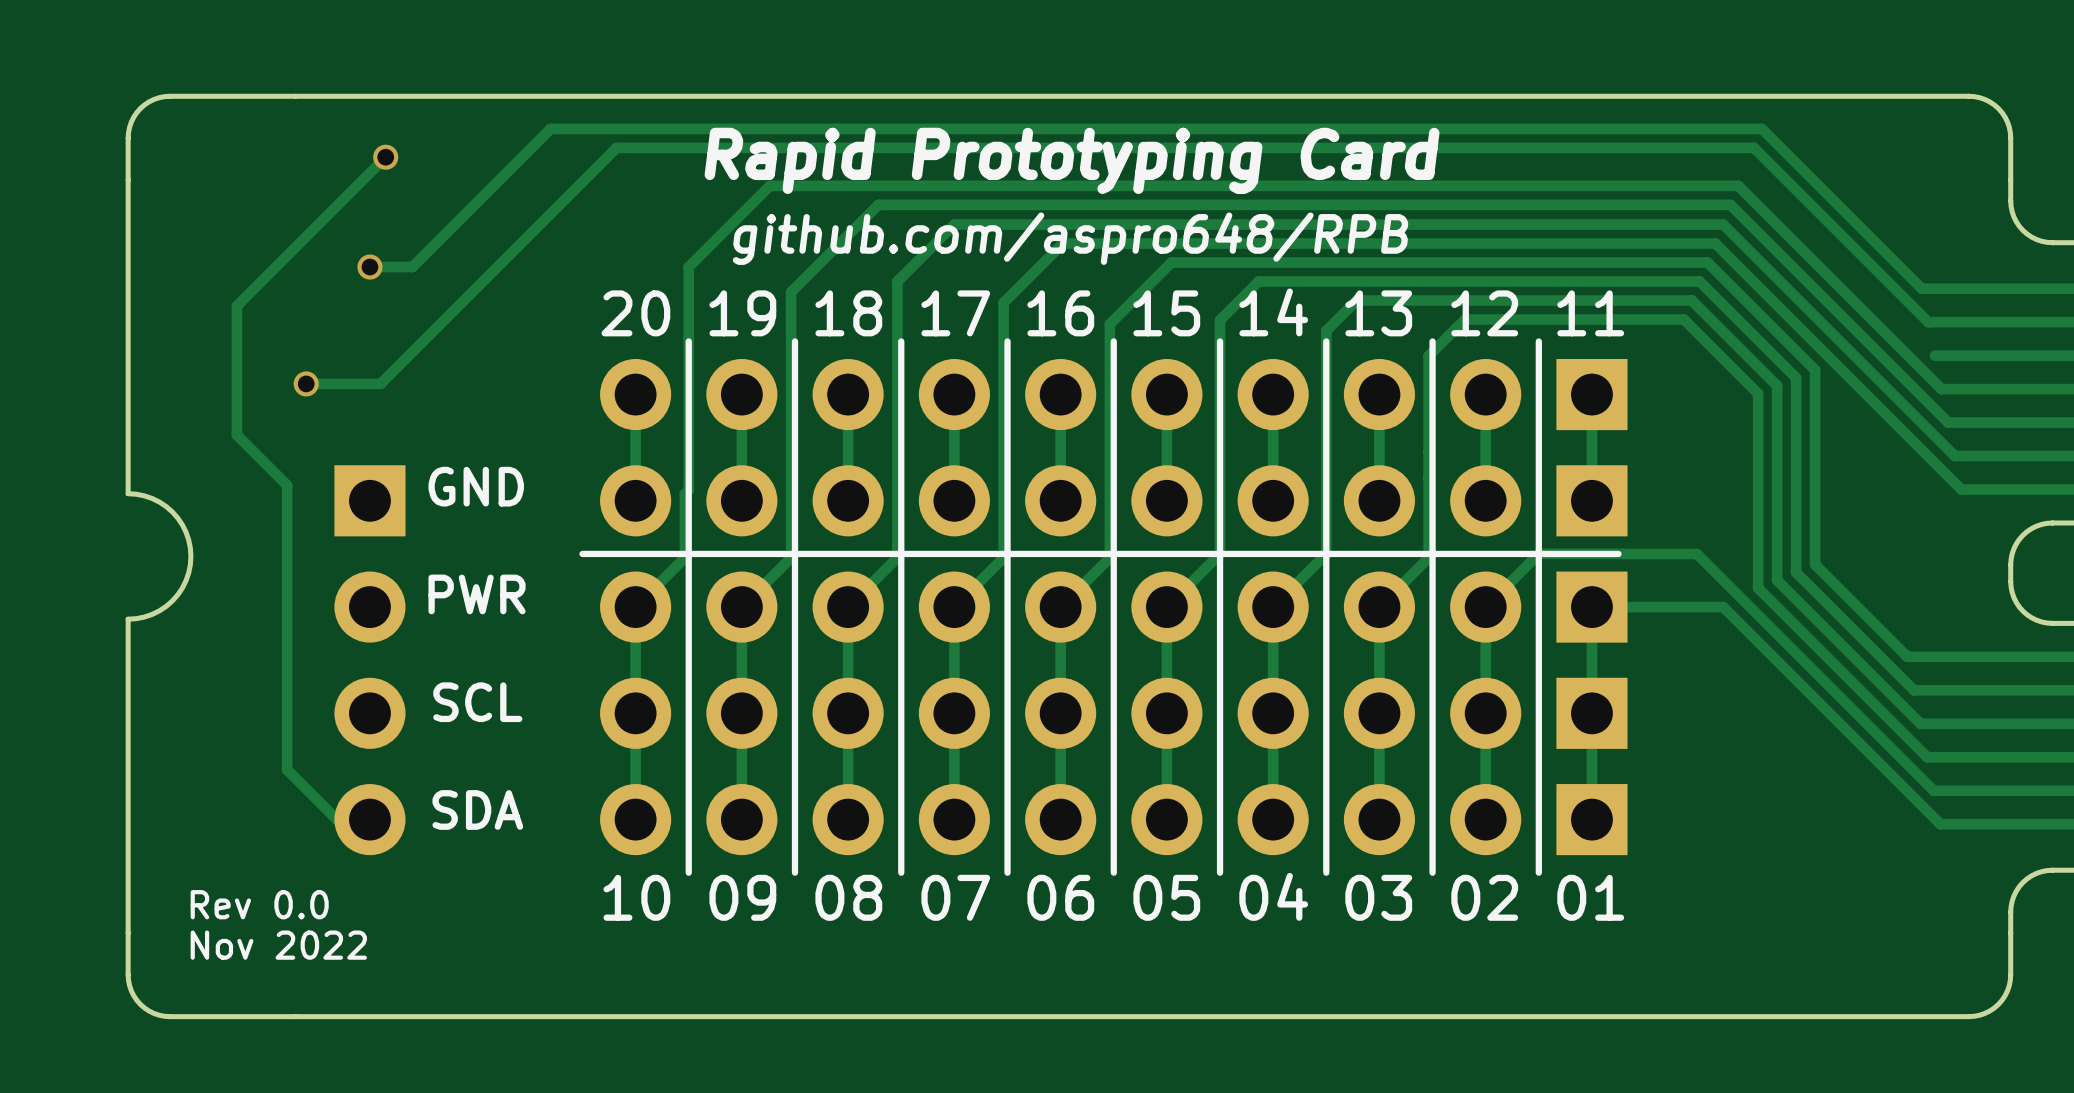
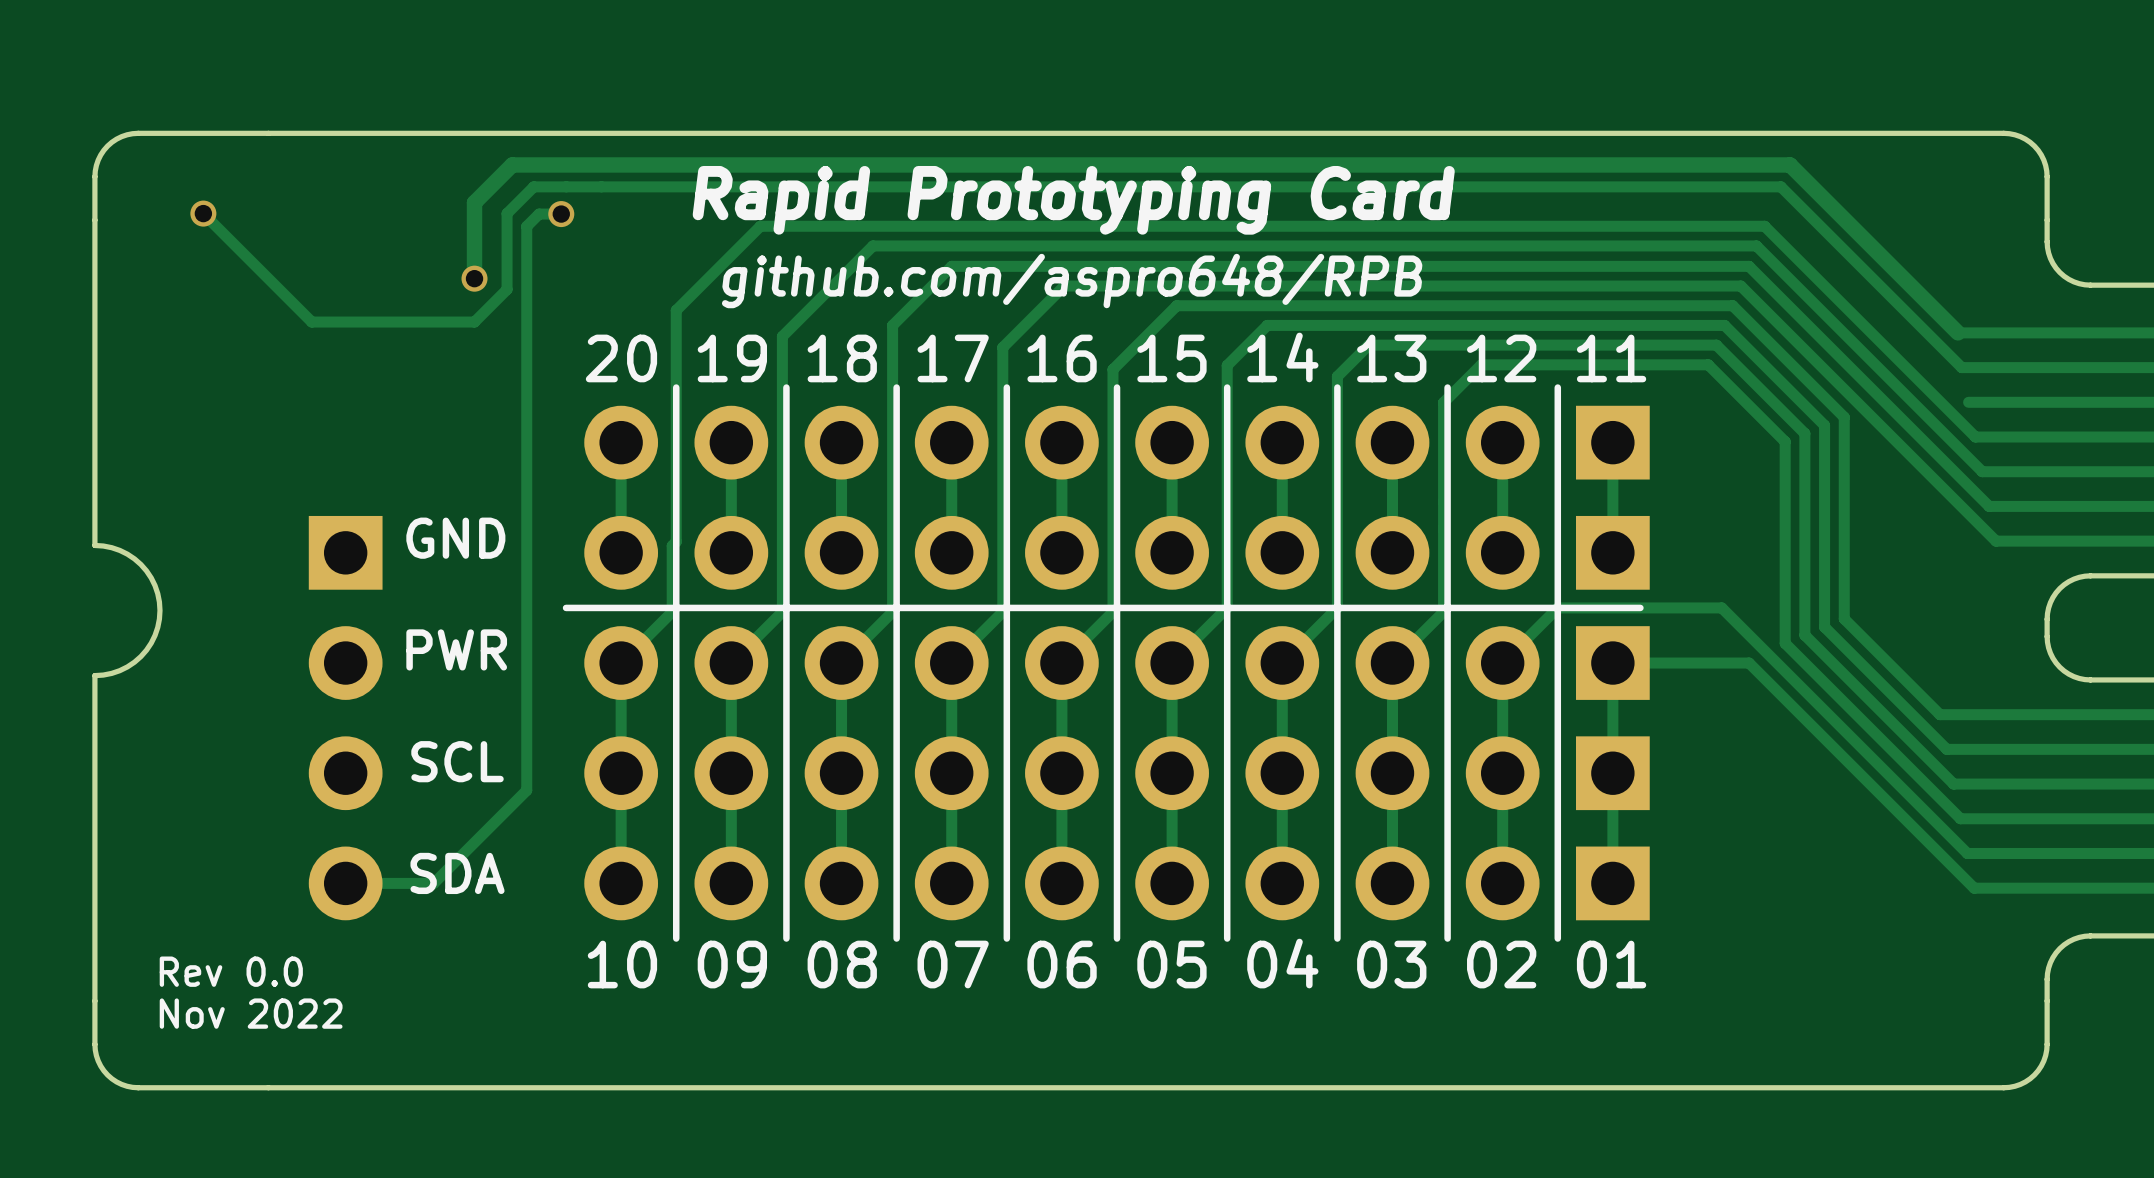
track: (616, 147) (380, 383) (306, 383) -> (601, 186) (533, 186) (507, 213) (507, 289) (474, 322) (311, 322) (203, 213)
track: (385, 157) (236, 306) (236, 435) (287, 485) (287, 769) (336, 819) (369, 819) -> (561, 214) (539, 214) (526, 226) (526, 790) (433, 883) (345, 883)
via: (385, 157) -> none
via: none -> (203, 213)
via: none -> (561, 214)
via: none -> (474, 278)
track: (369, 267) (412, 267) (550, 128) (1761, 128) (1921, 288) (1924, 288) -> (474, 278) (474, 202) (512, 164) (1790, 164) (1958, 332)
via: (369, 267) -> none
via: (306, 383) -> none

